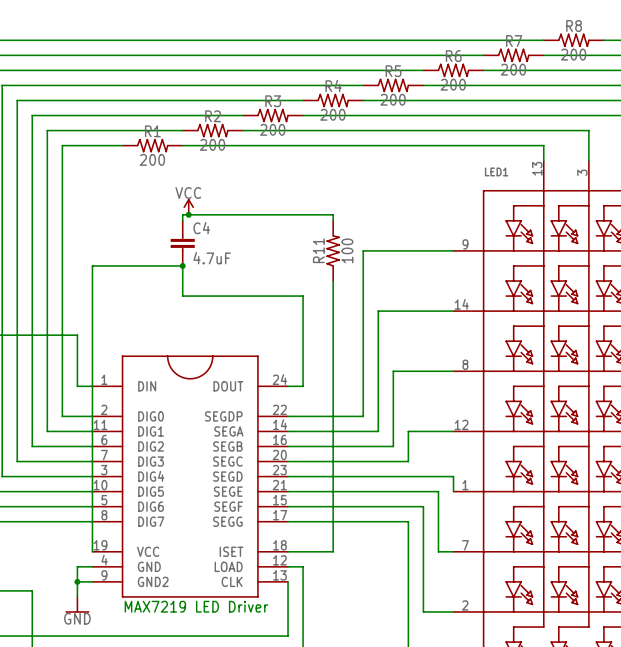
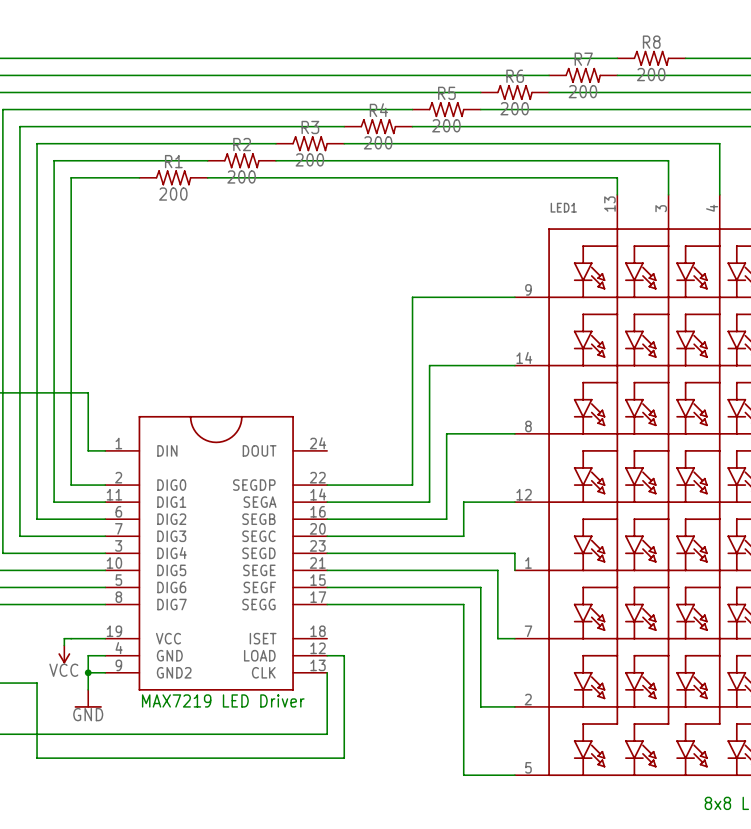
power symbol: VCC (188, 206) -> none
junction: (188, 214) -> none
wire: (182, 220) (182, 214) (333, 214) (333, 220) -> none
C4: 4.7uF (182, 243) -> none
R11: 100 (333, 250) -> none
junction: (182, 265) -> none
wire: (333, 281) (333, 551) (288, 551) -> none
wire: (288, 386) (303, 386) (303, 296) (182, 296) (182, 265) (92, 265) (92, 551) -> (64, 645) (64, 638) (105, 638)
power symbol: none -> VCC (64, 654)

